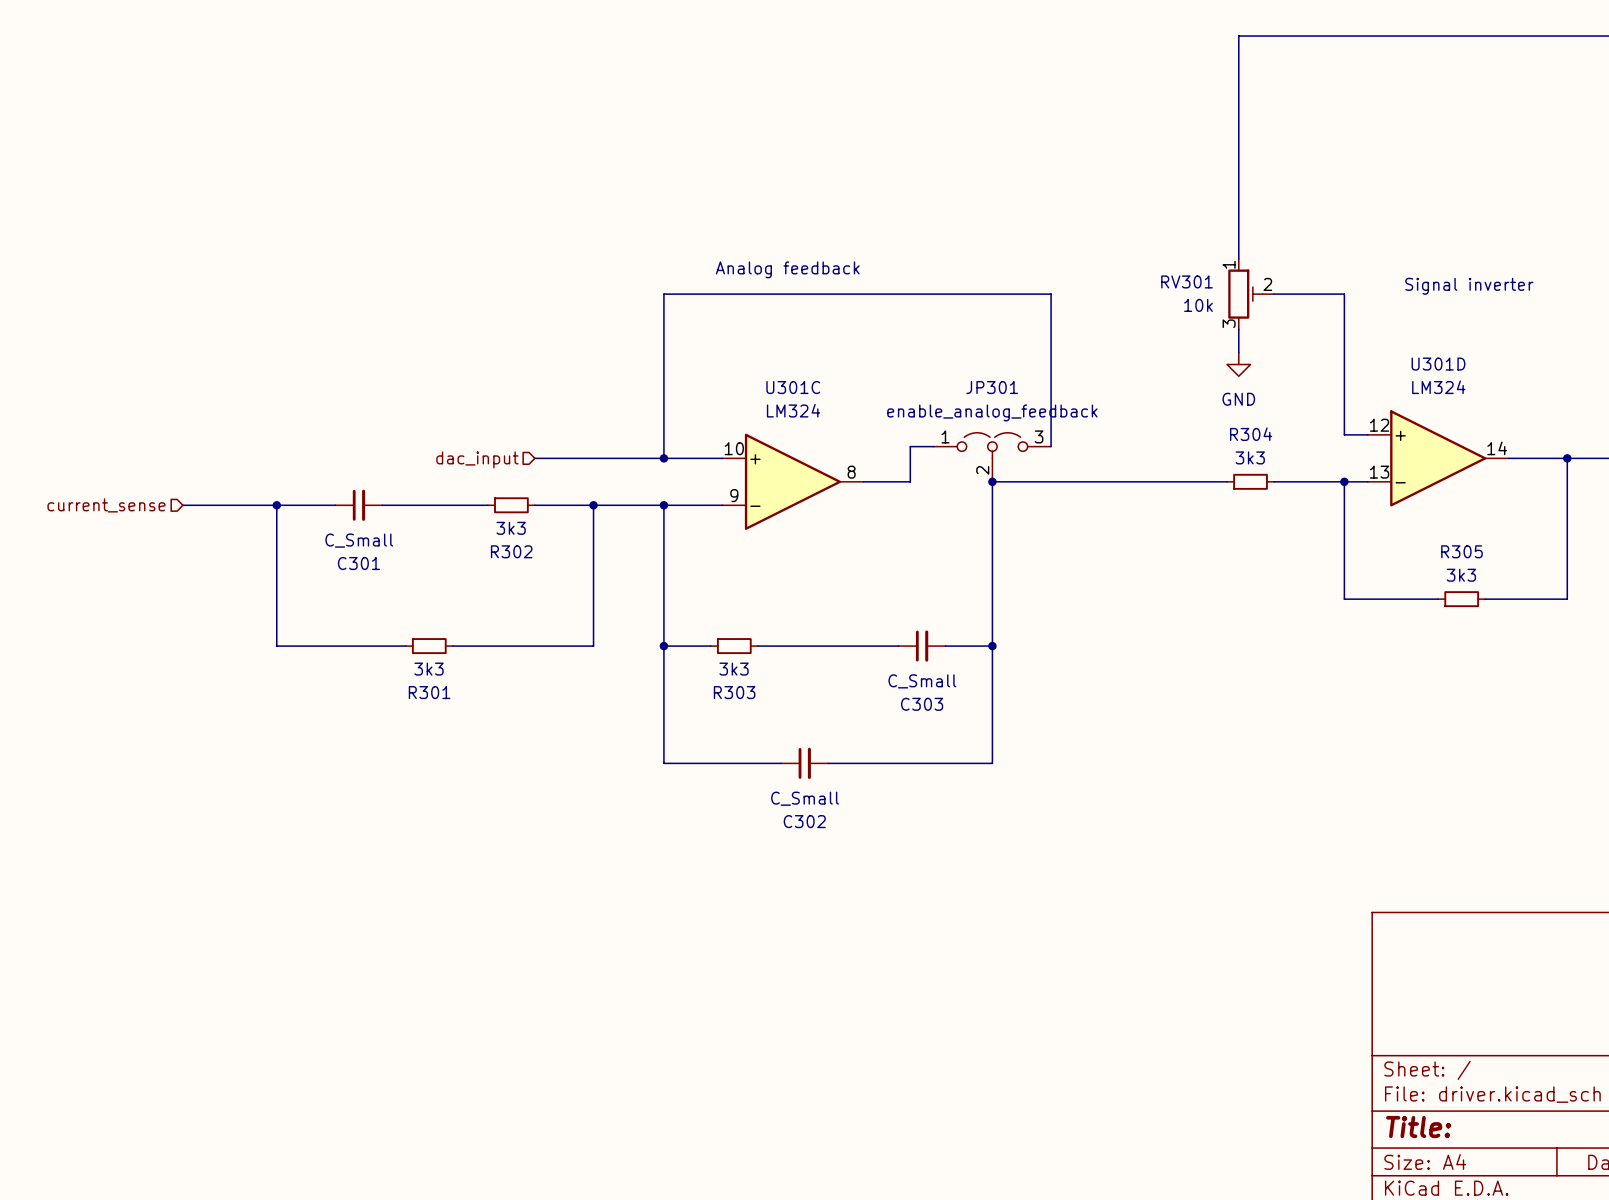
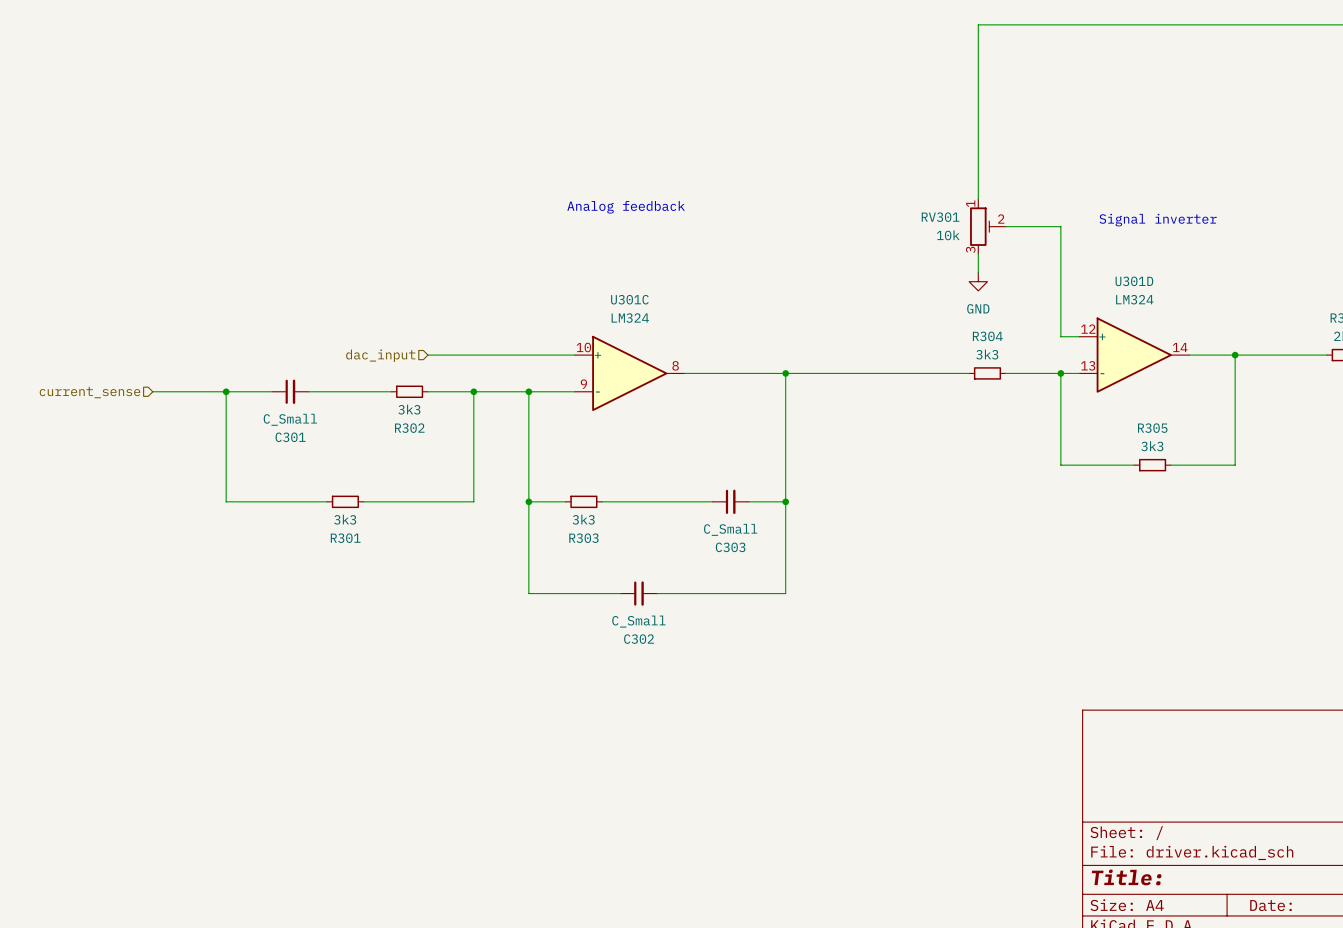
wire: (933, 446) (910, 446) (910, 481) -> (785, 373) (721, 373)
wire: (1051, 446) (1051, 294) (663, 294) (663, 458) -> none
JP301: enable_analog_feedback (992, 457) -> none
junction: (663, 458) -> none

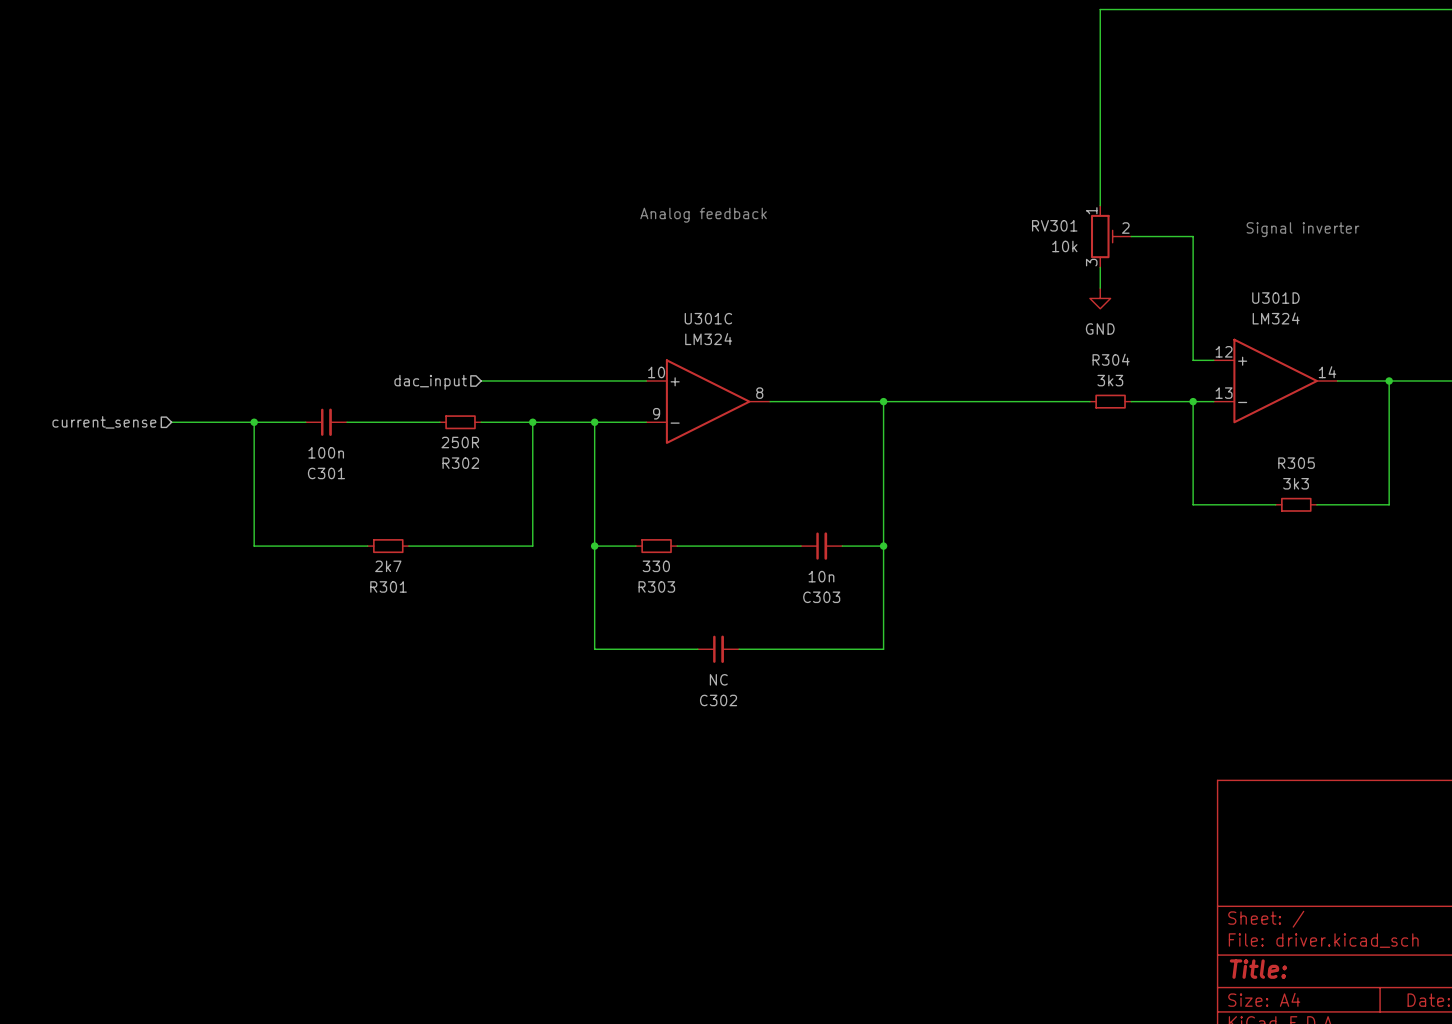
R302 value: 3k3 (409, 409) -> 250R (460, 442)
C301 value: C_Small (290, 419) -> 100n (326, 452)
R301 value: 3k3 (345, 519) -> 2k7 (388, 566)
R303 value: 3k3 (583, 519) -> 330 (656, 566)
C303 value: C_Small (730, 529) -> 10n (821, 576)
C302 value: C_Small (638, 621) -> NC (718, 679)

